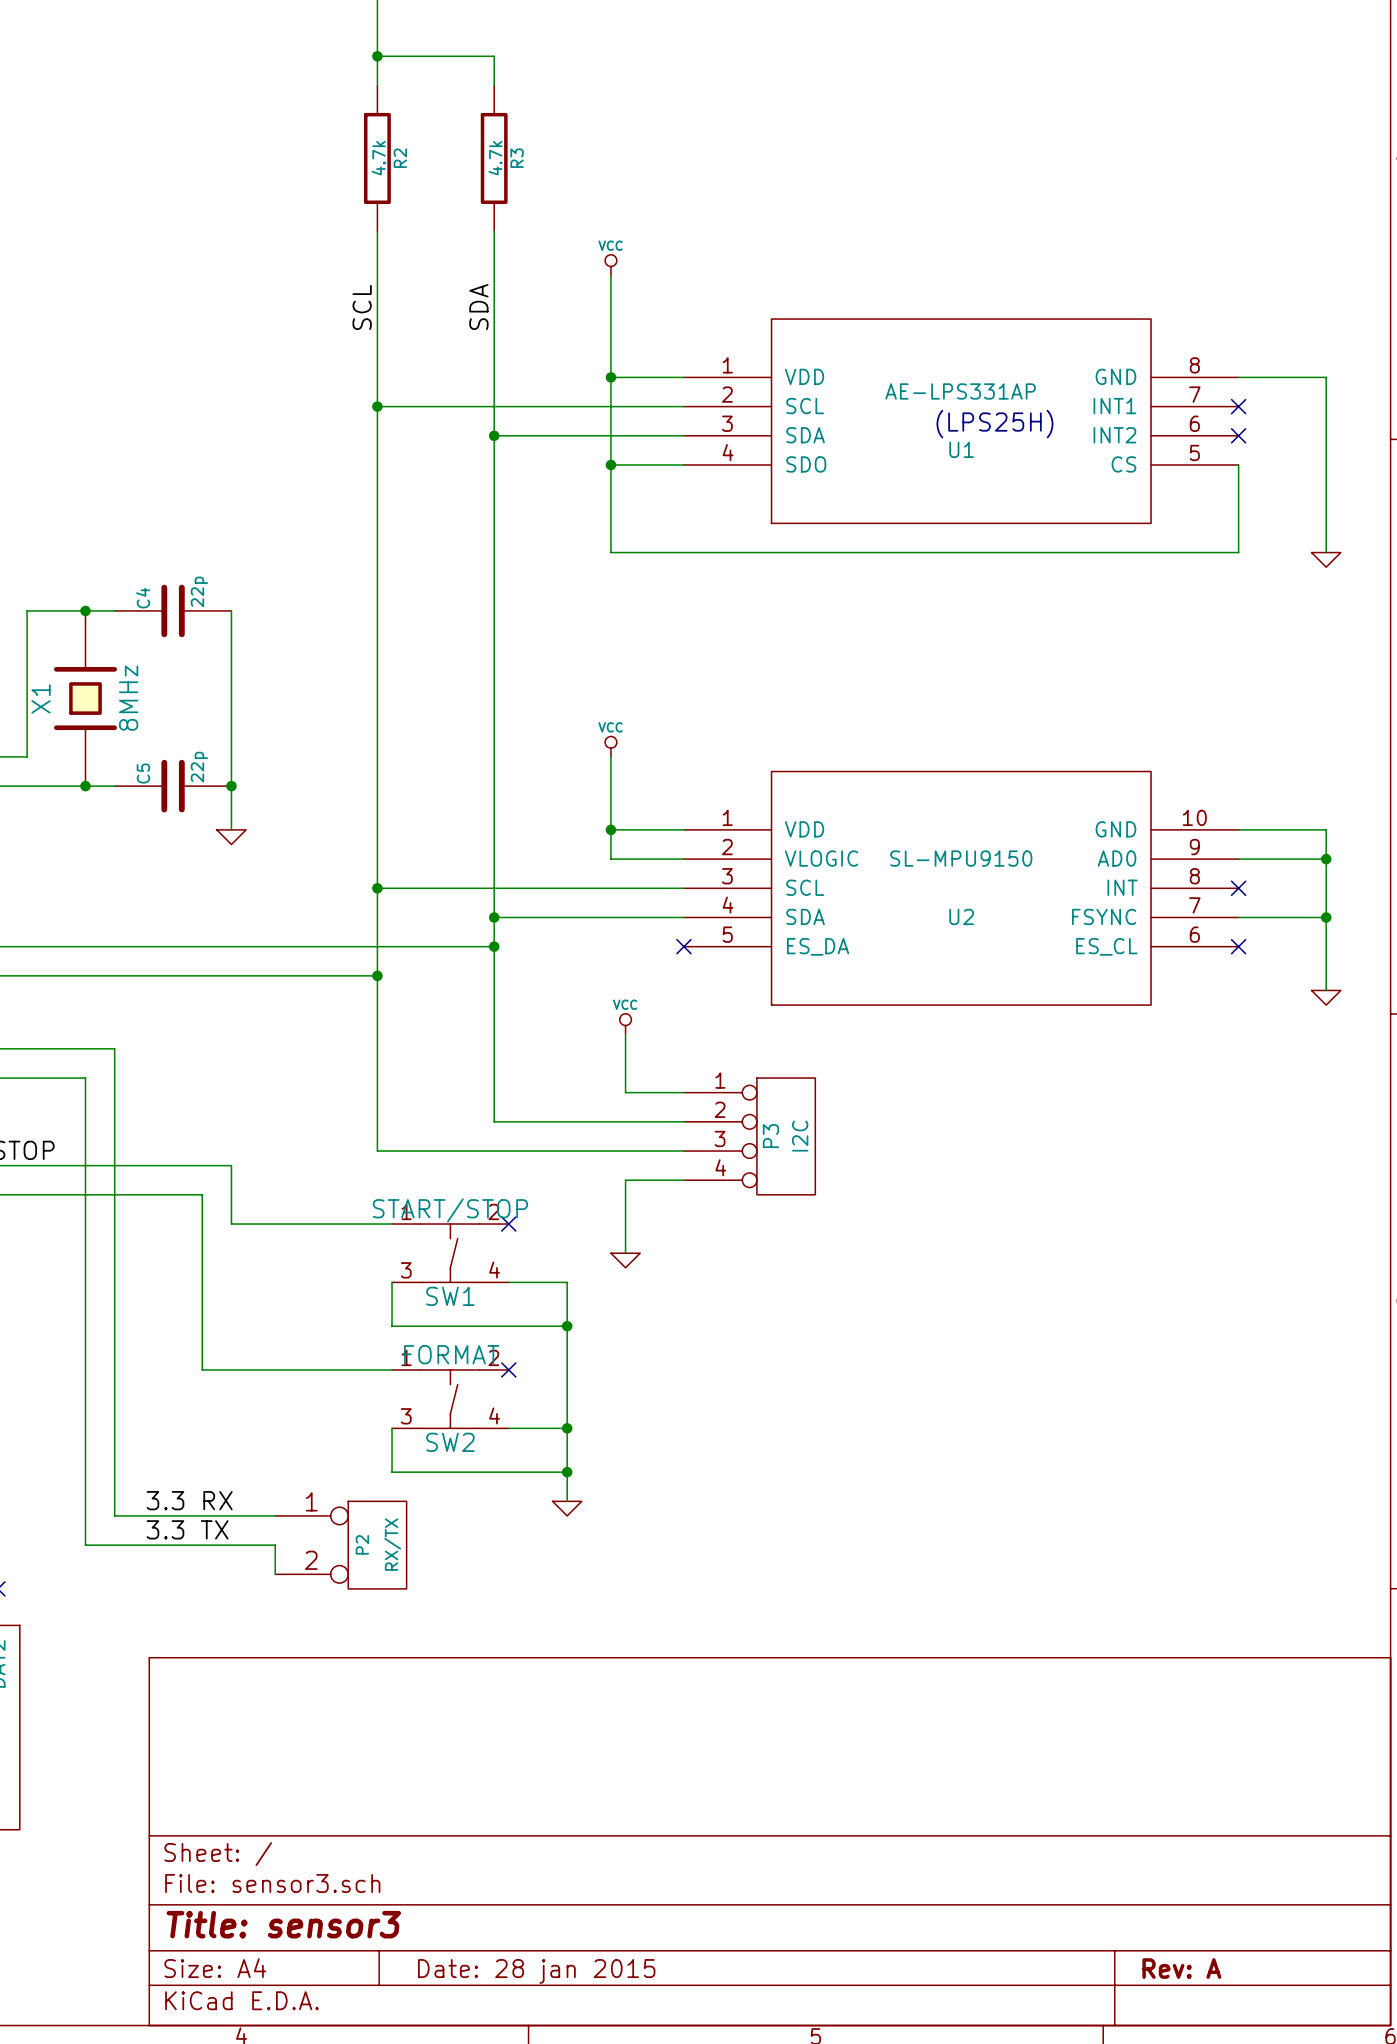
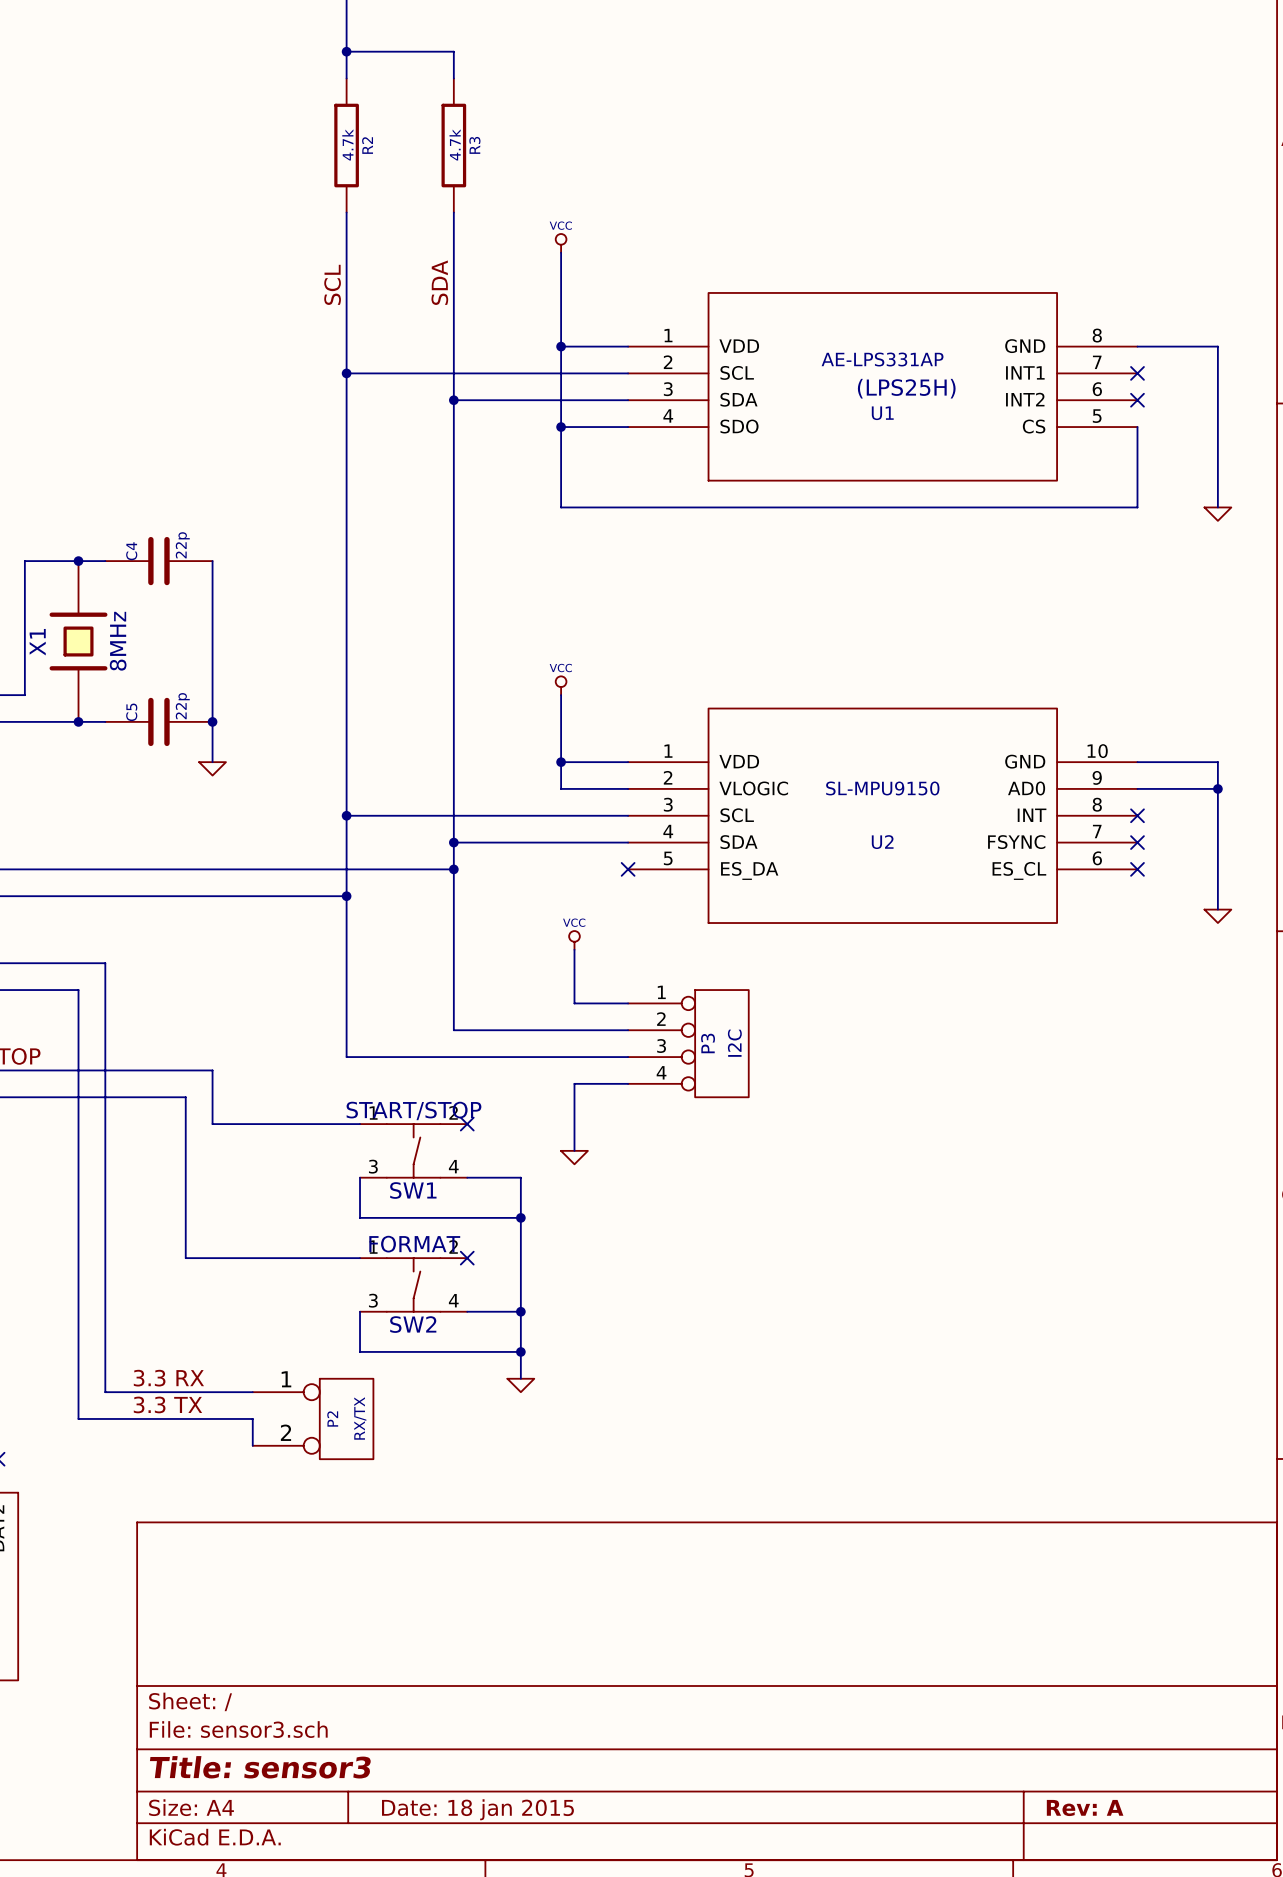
wire: (1238, 917) (1326, 917) -> none
no-connect mark: none -> (1137, 842)
junction: (1326, 917) -> none
title block: Date: 28 jan 2015 (536, 1971) -> Date: 18 jan 2015 (477, 1809)

